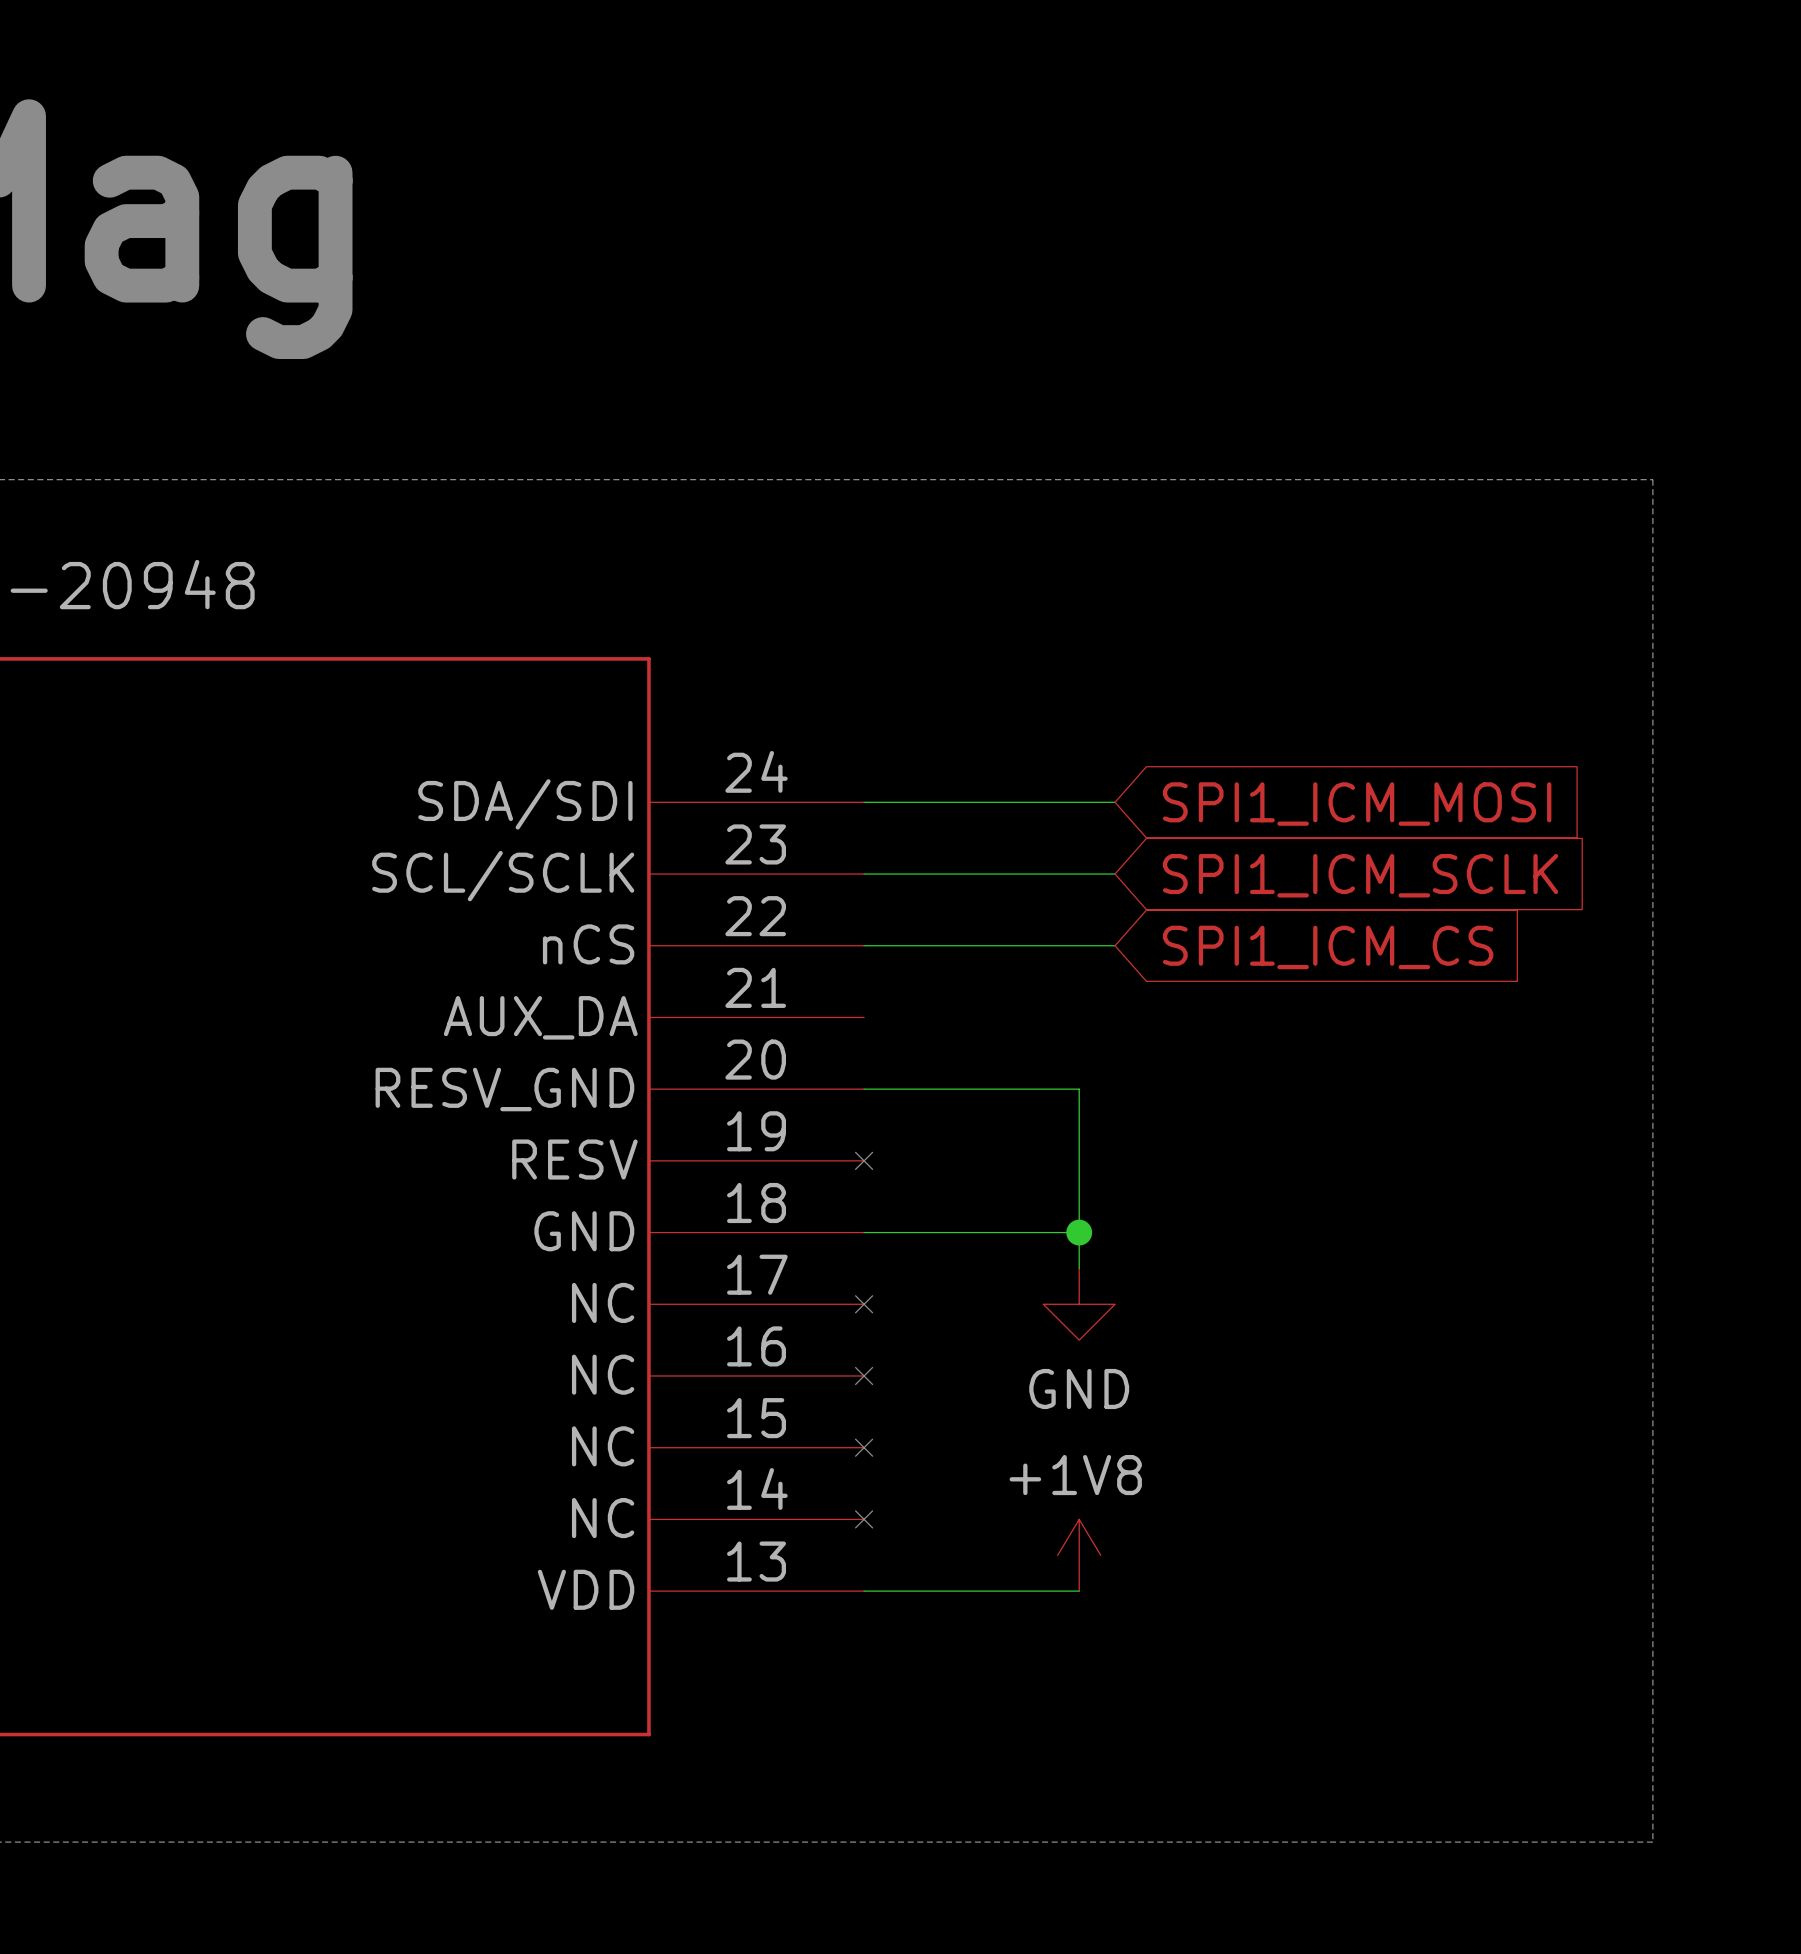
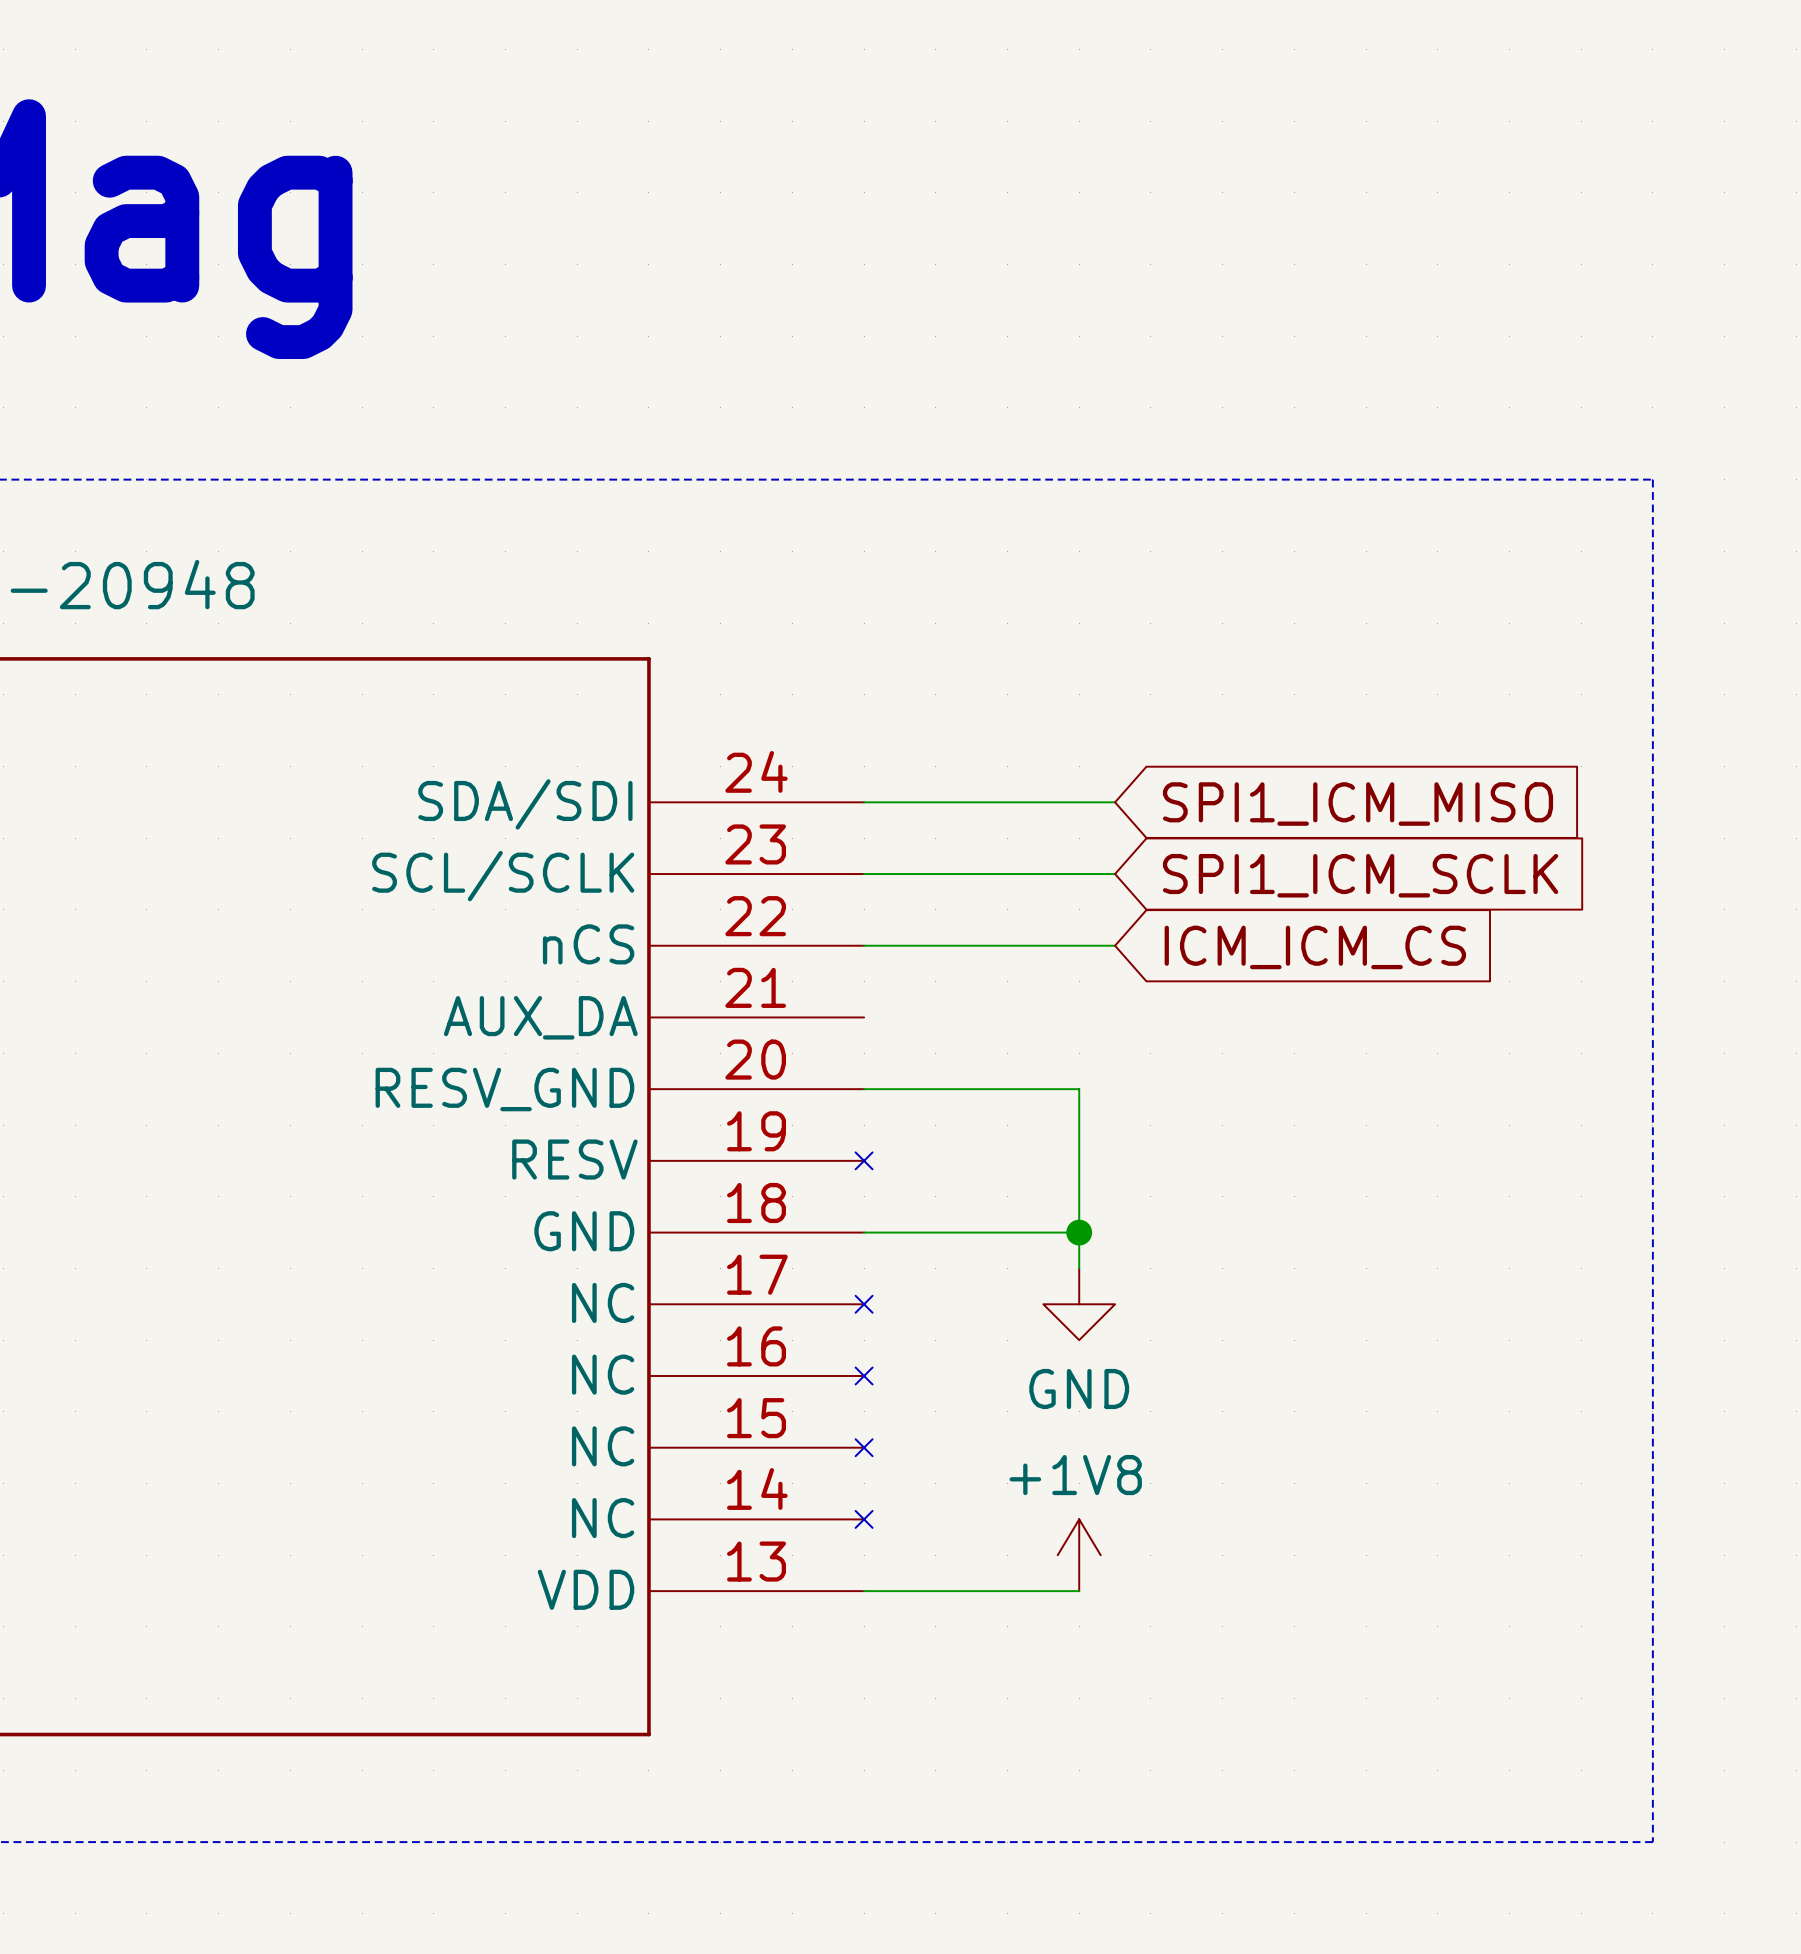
global label: SPI1_ICM_MOSI (1357, 804) -> SPI1_ICM_MISO (1357, 804)
global label: SPI1_ICM_CS (1328, 947) -> ICM_ICM_CS (1315, 947)

